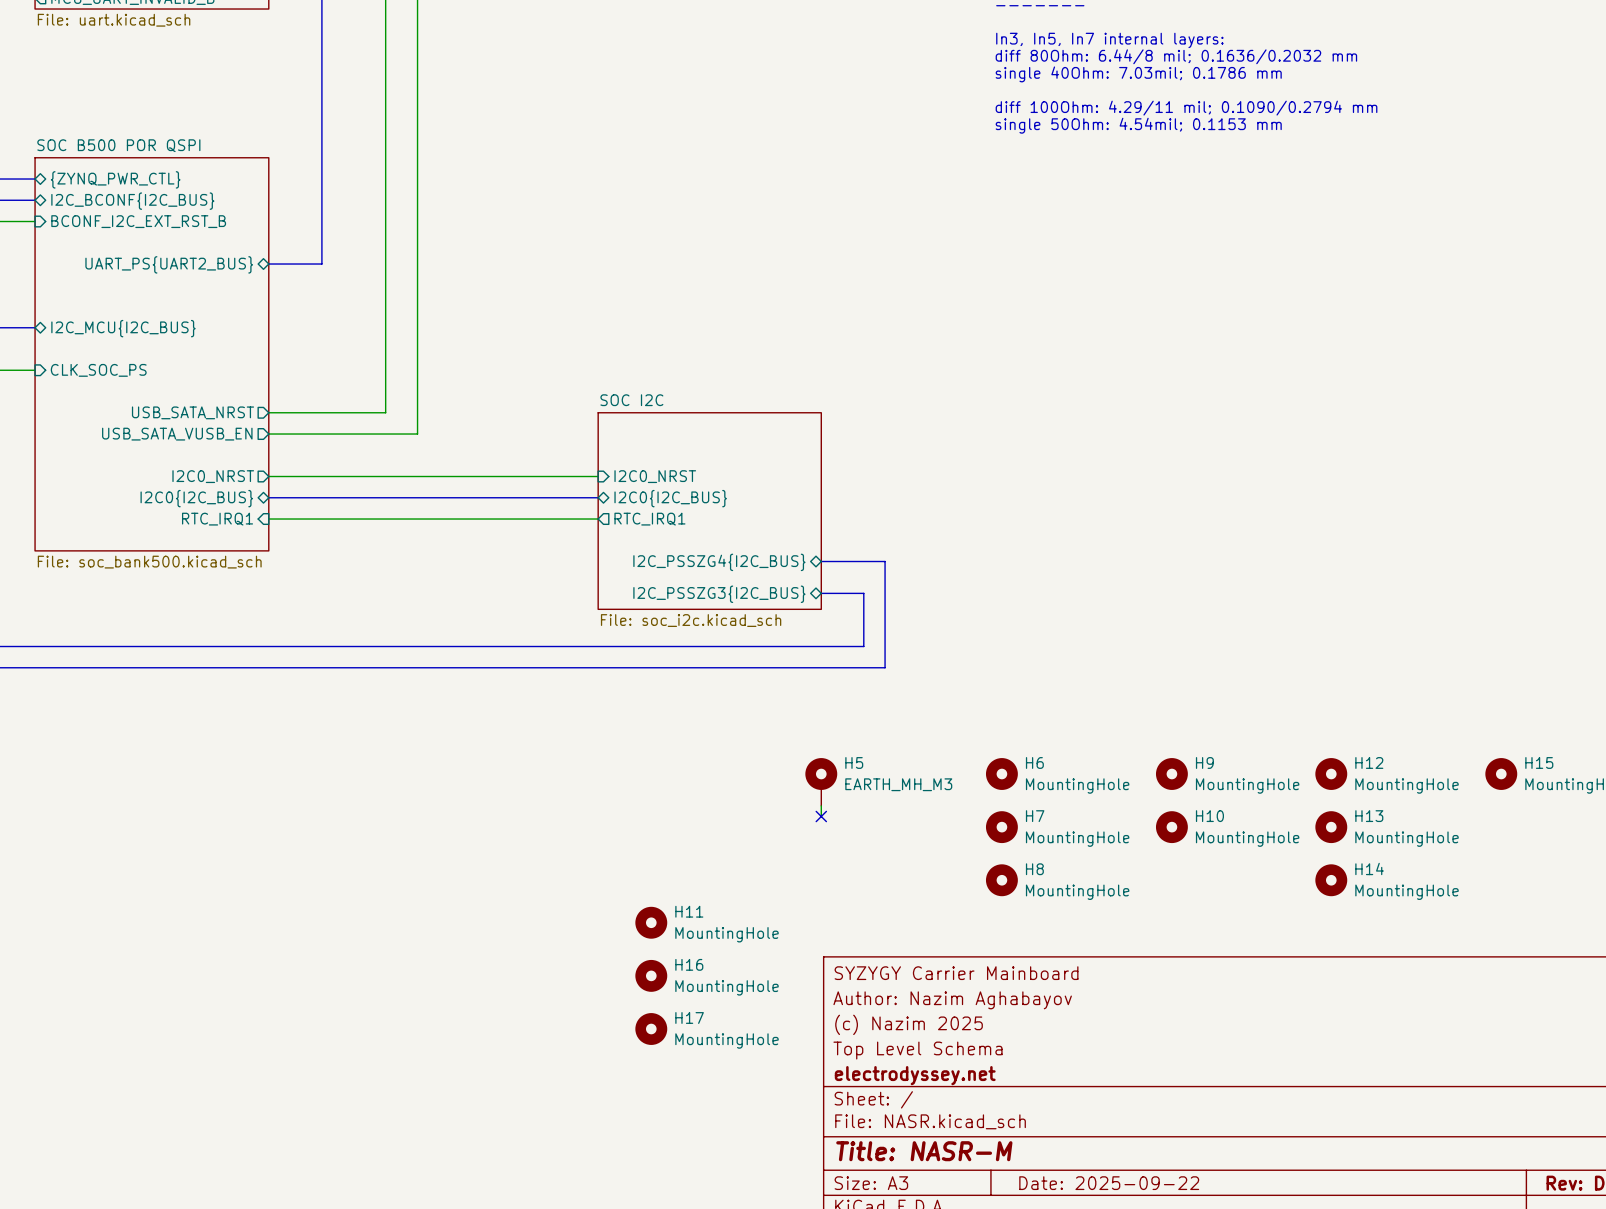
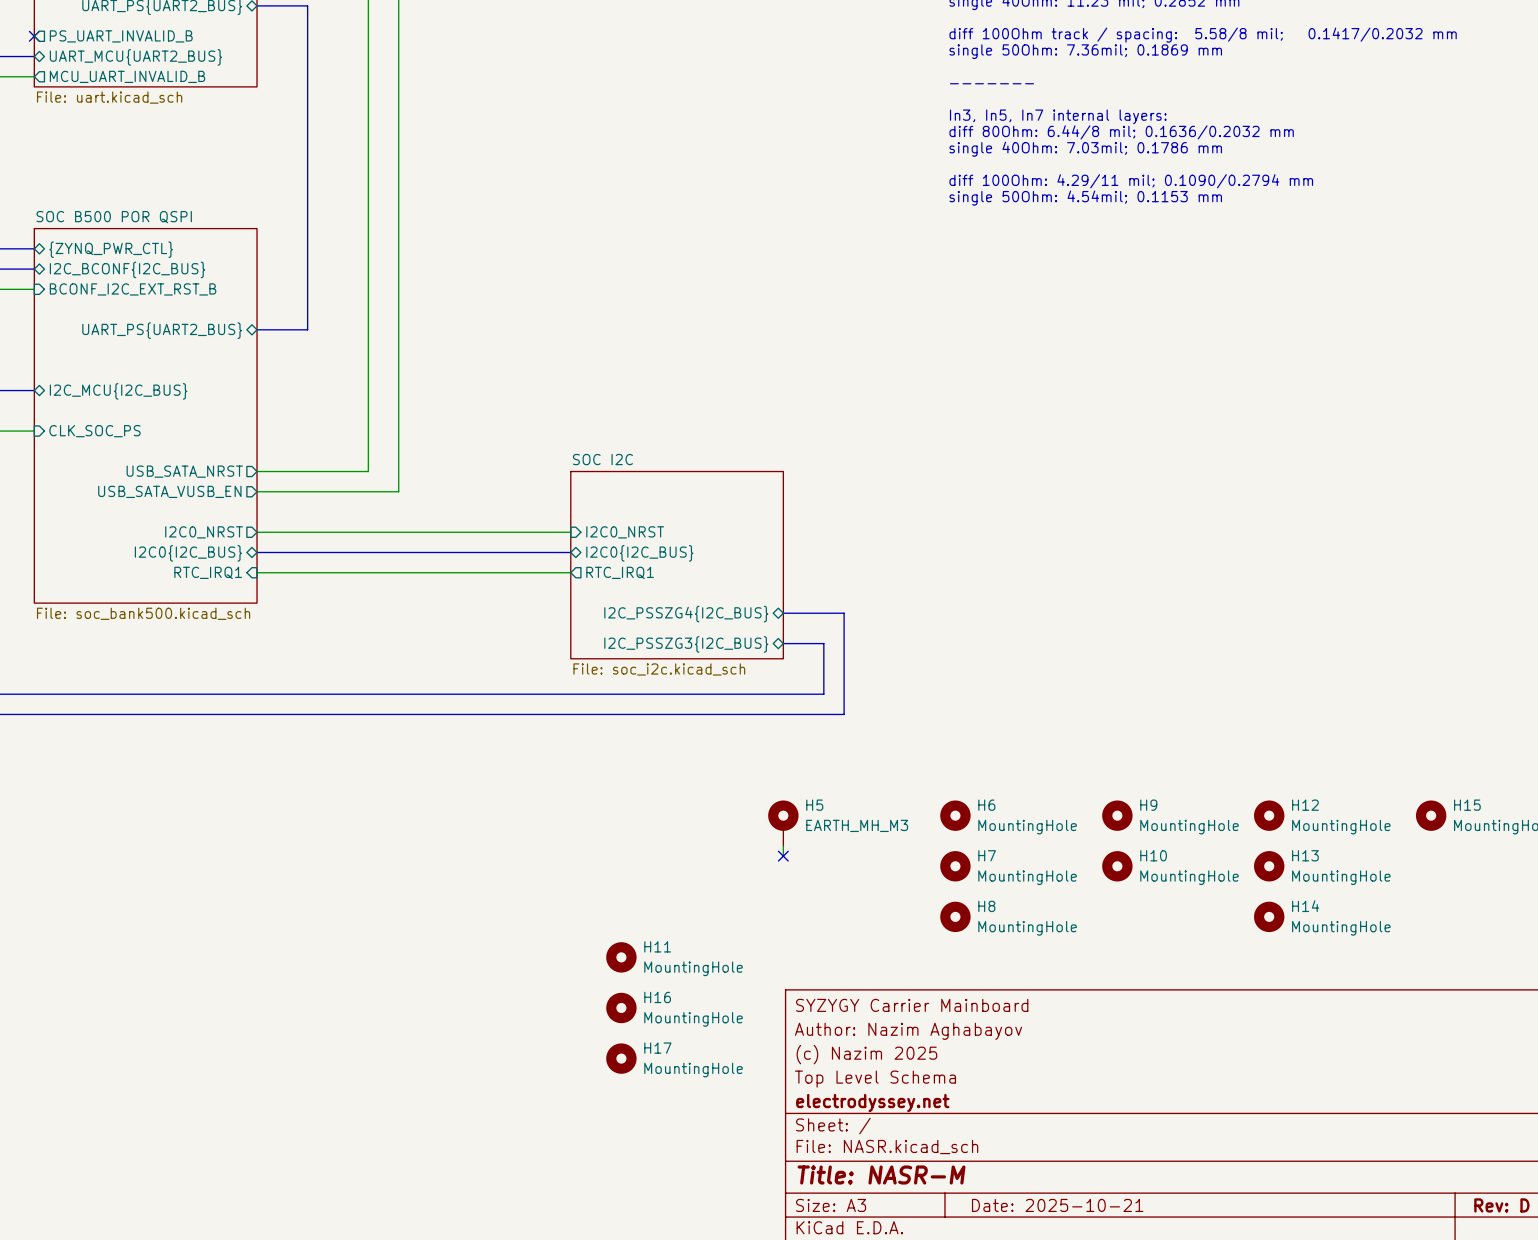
title block: Date: 2025-09-22 (1109, 1183) -> Date: 2025-10-21 (1057, 1205)

